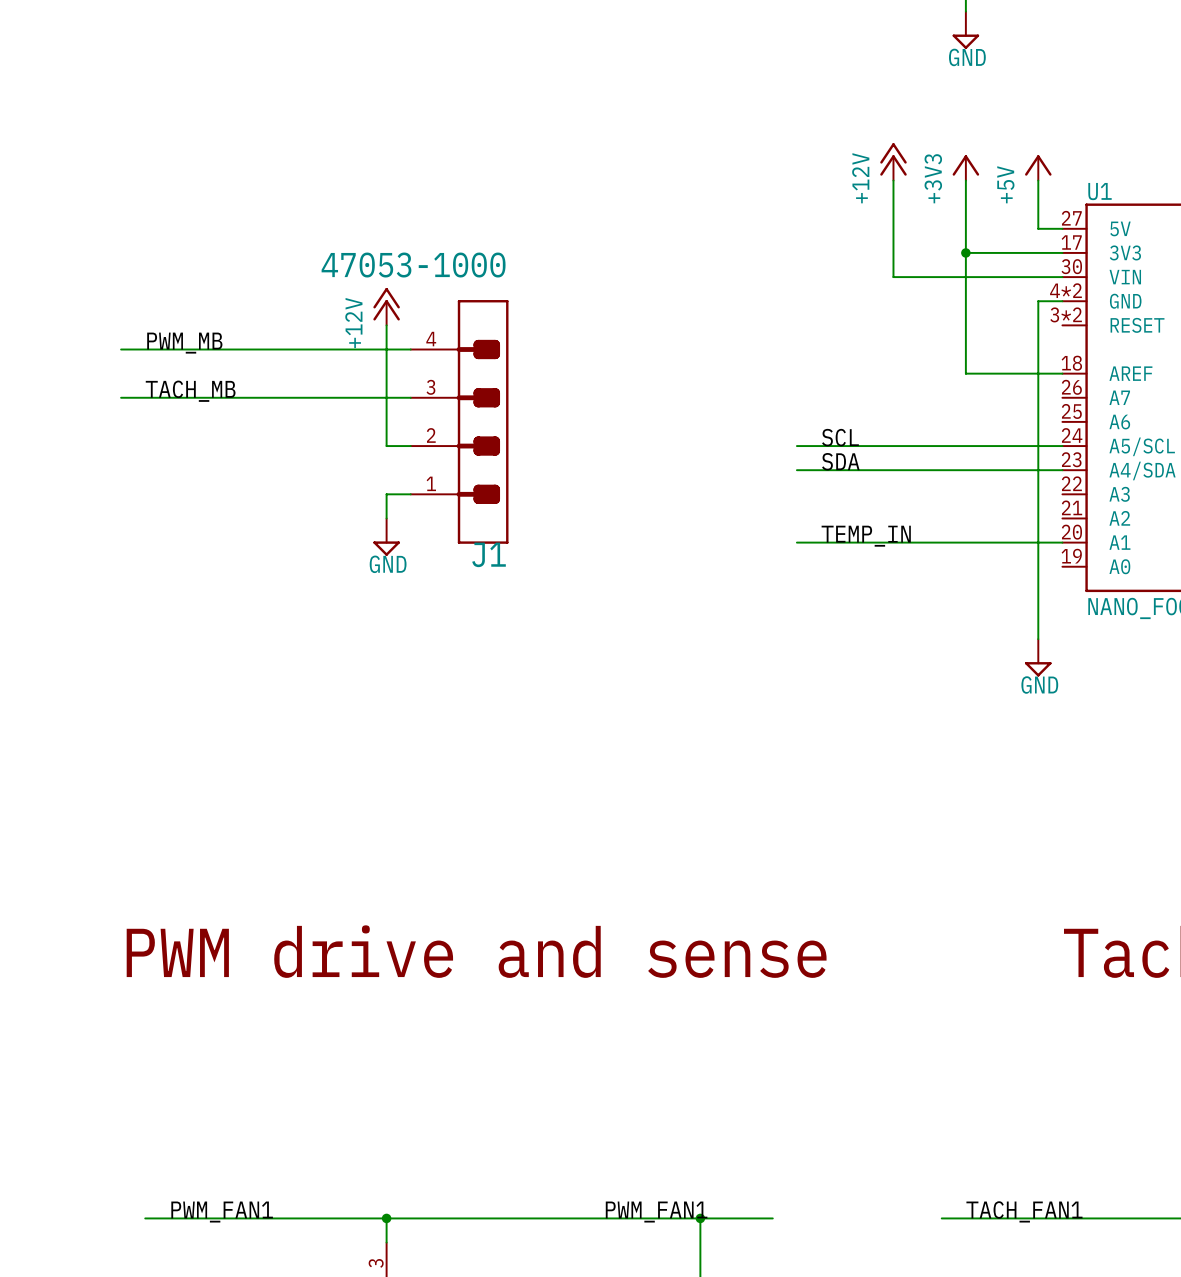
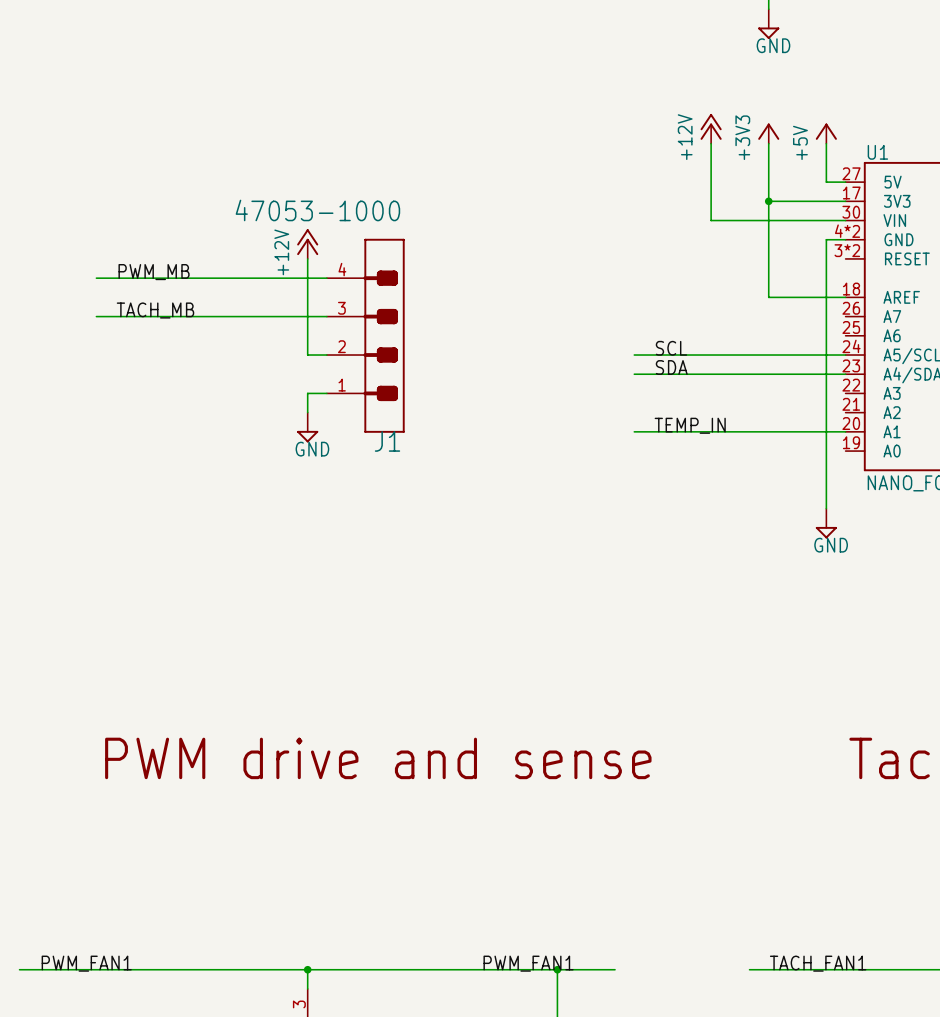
label position: PWM_FAN1 (222, 1212) -> PWM_FAN1 (86, 963)
wire: none -> (19, 969) (115, 969)

